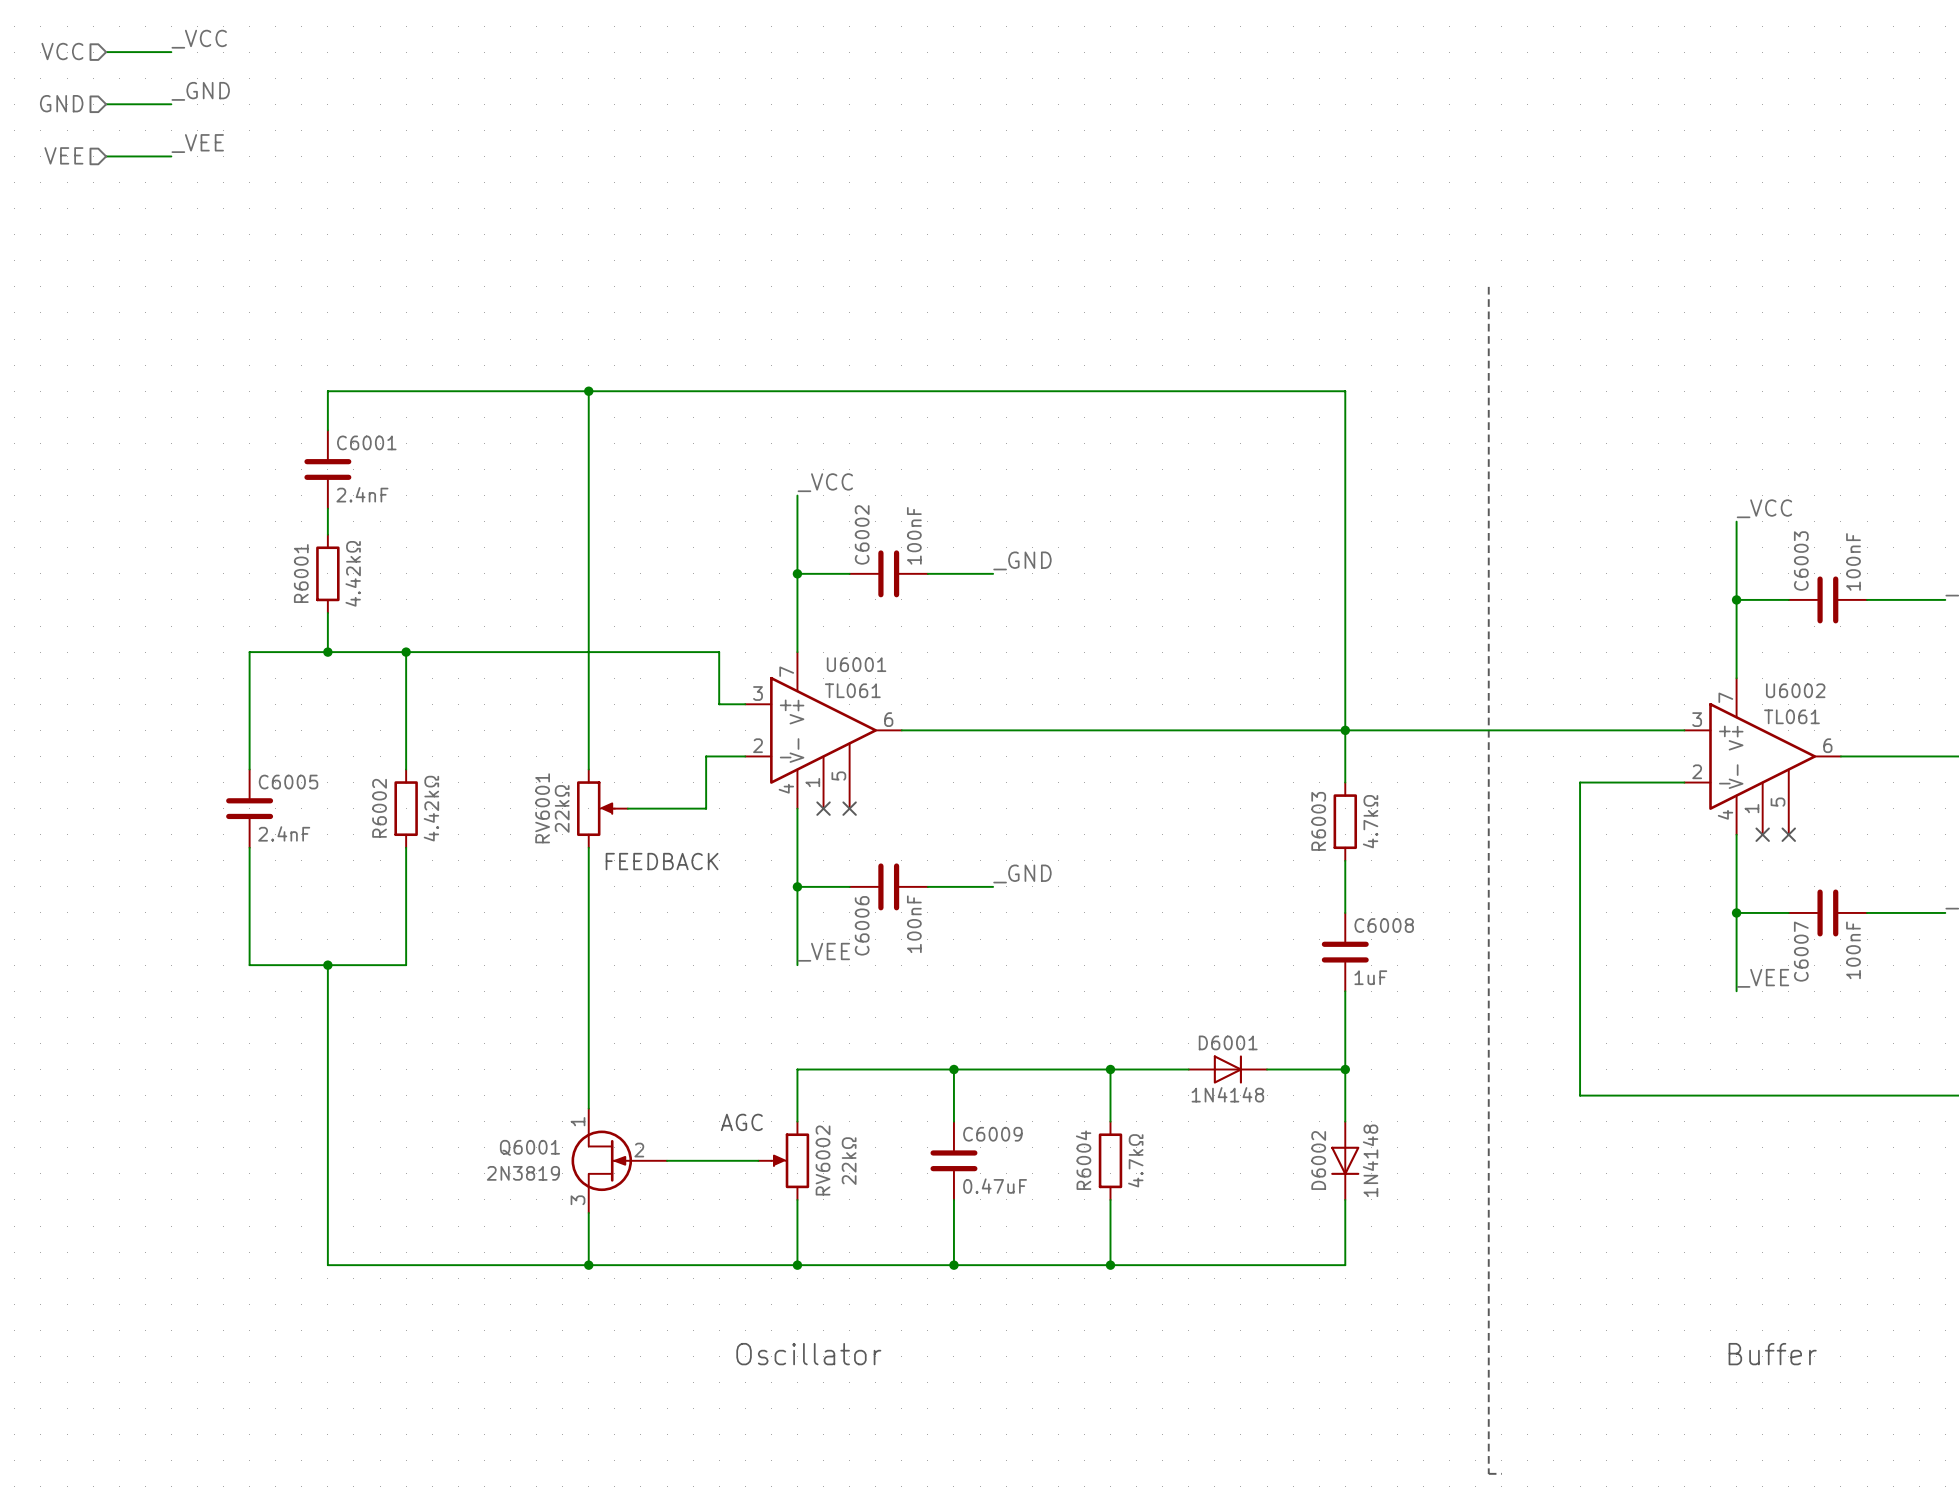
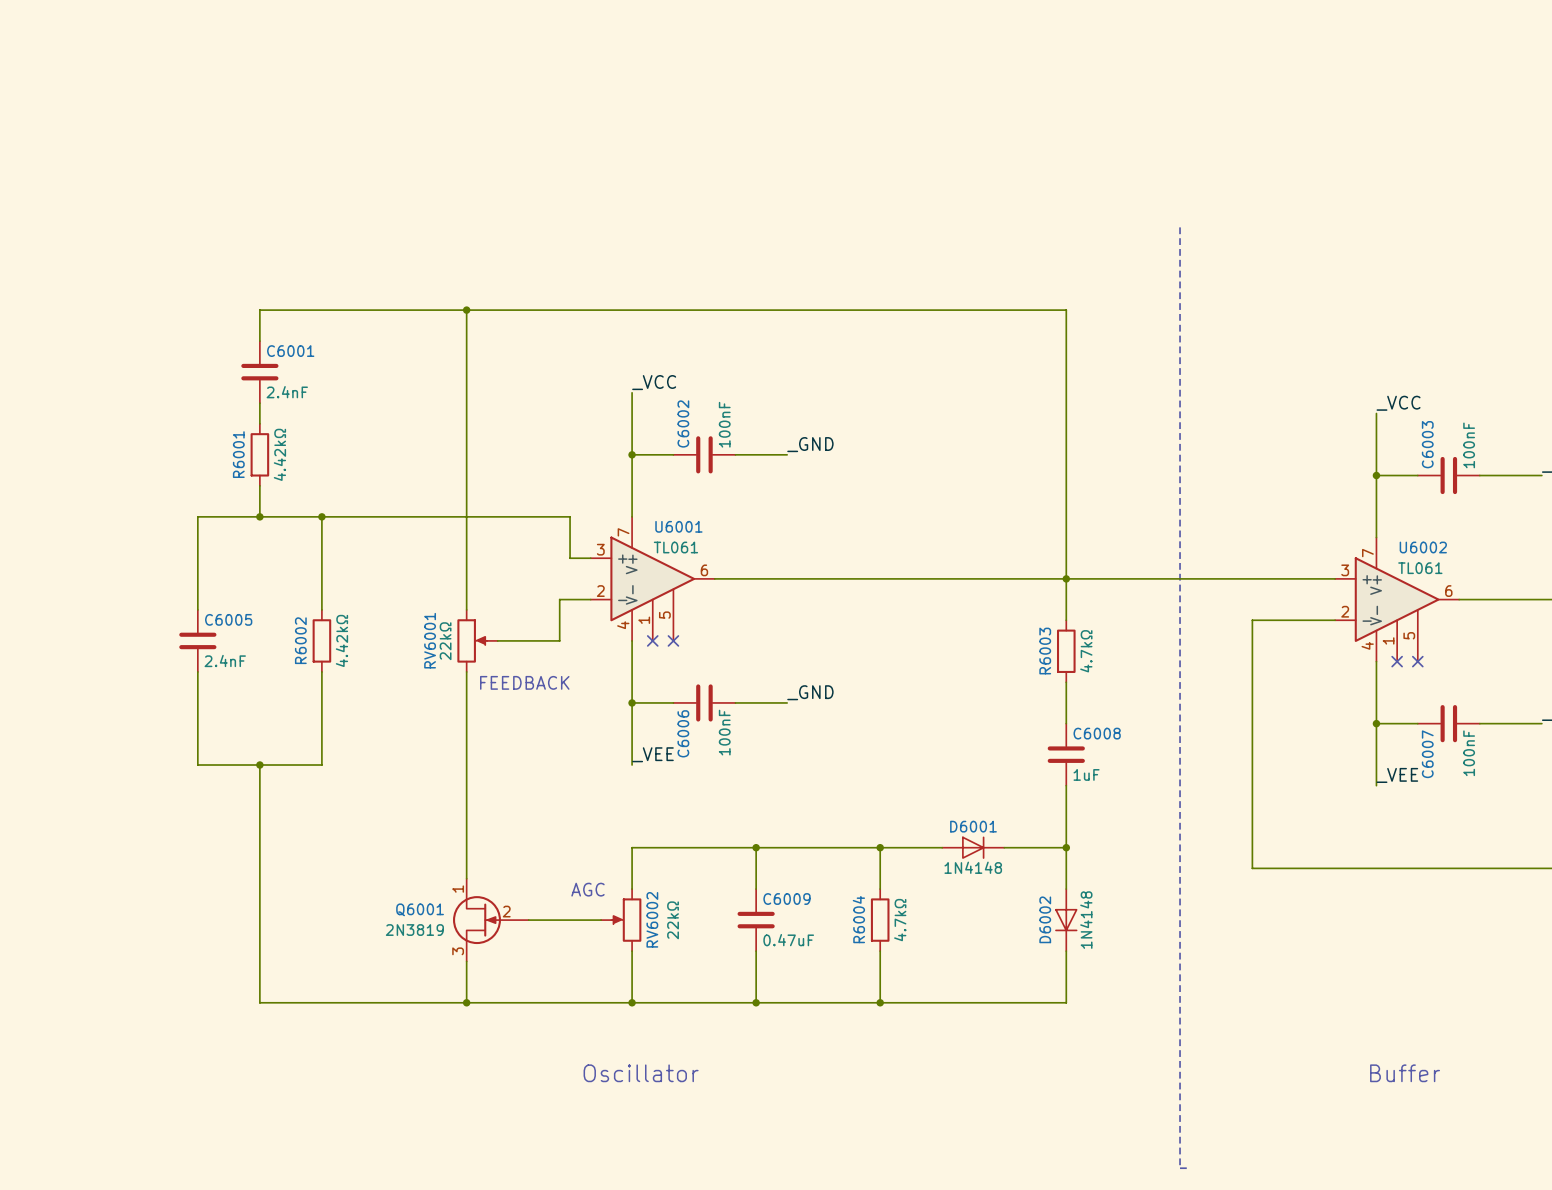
label: _VCC (199, 39) -> none
hierarchical label: VCC (62, 51) -> none
wire: (106, 52) (171, 52) -> none
label: _GND (200, 91) -> none
hierarchical label: GND (61, 103) -> none
wire: (106, 104) (171, 104) -> none
label: _VEE (197, 143) -> none
hierarchical label: VEE (63, 155) -> none
wire: (106, 156) (171, 156) -> none

